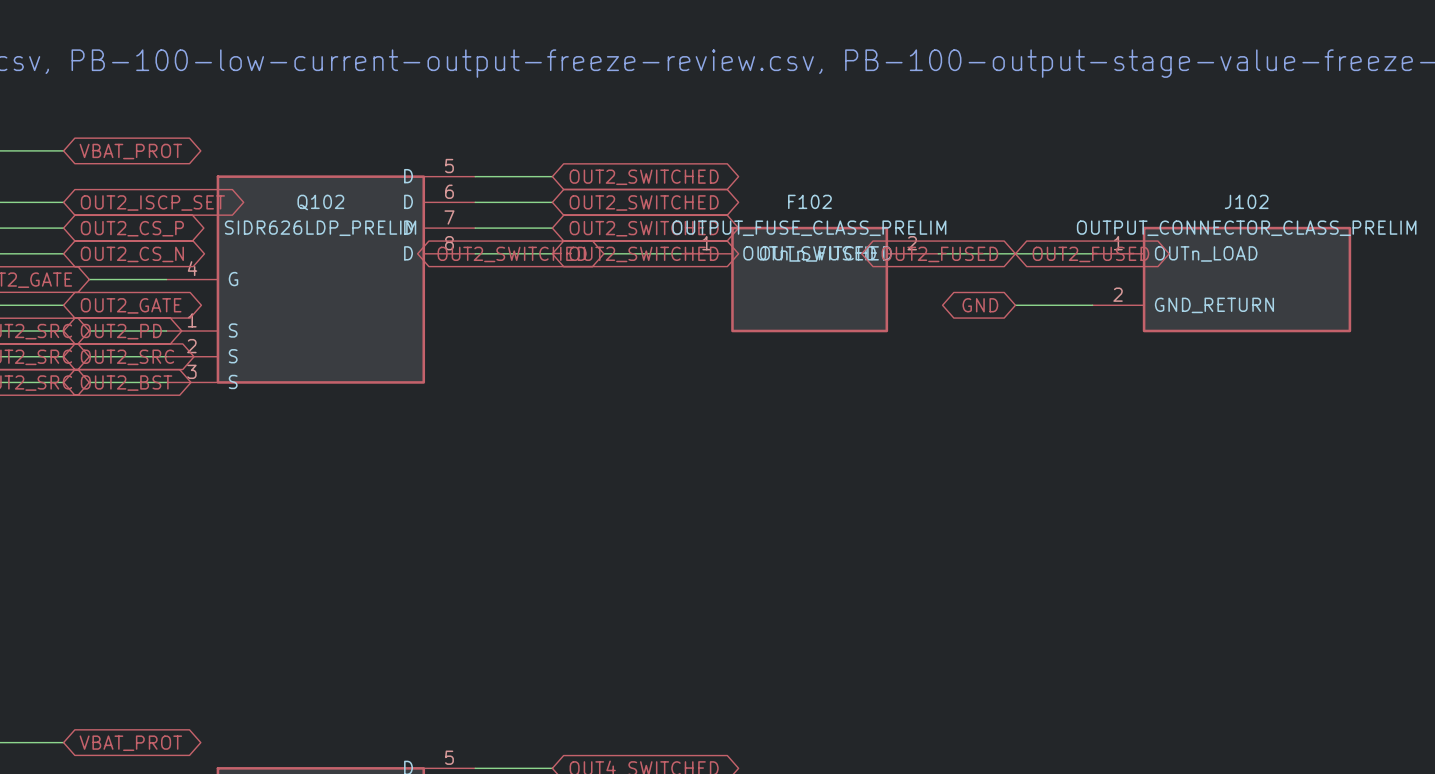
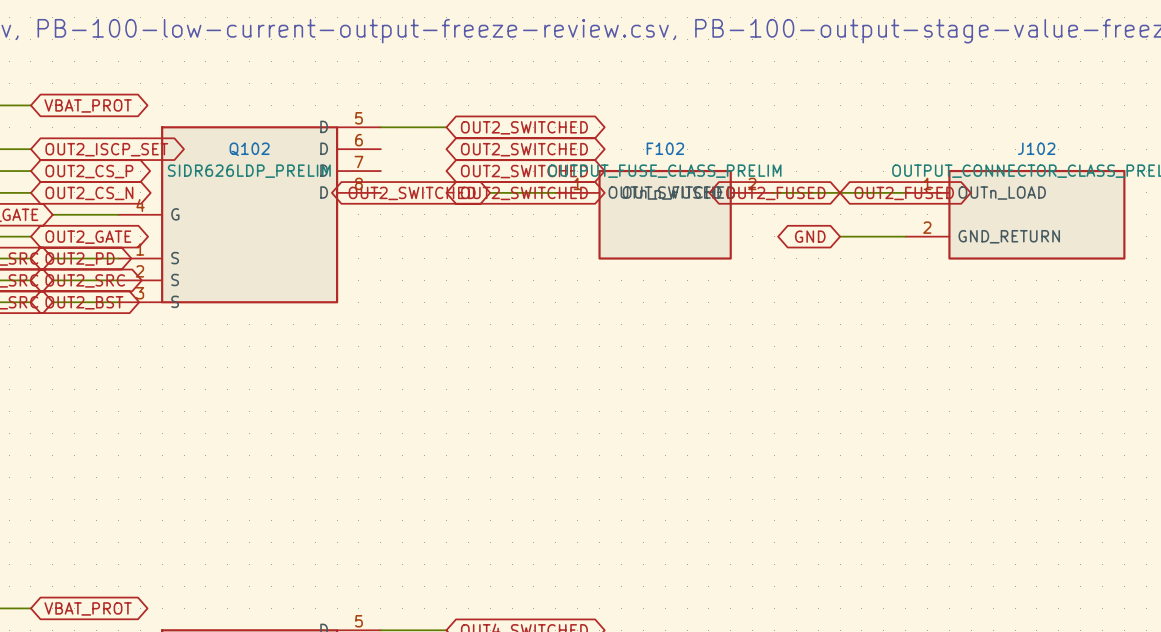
wire: (475, 202) (552, 202) -> none
wire: (475, 228) (552, 228) -> none
wire: (475, 253) (552, 253) -> none

